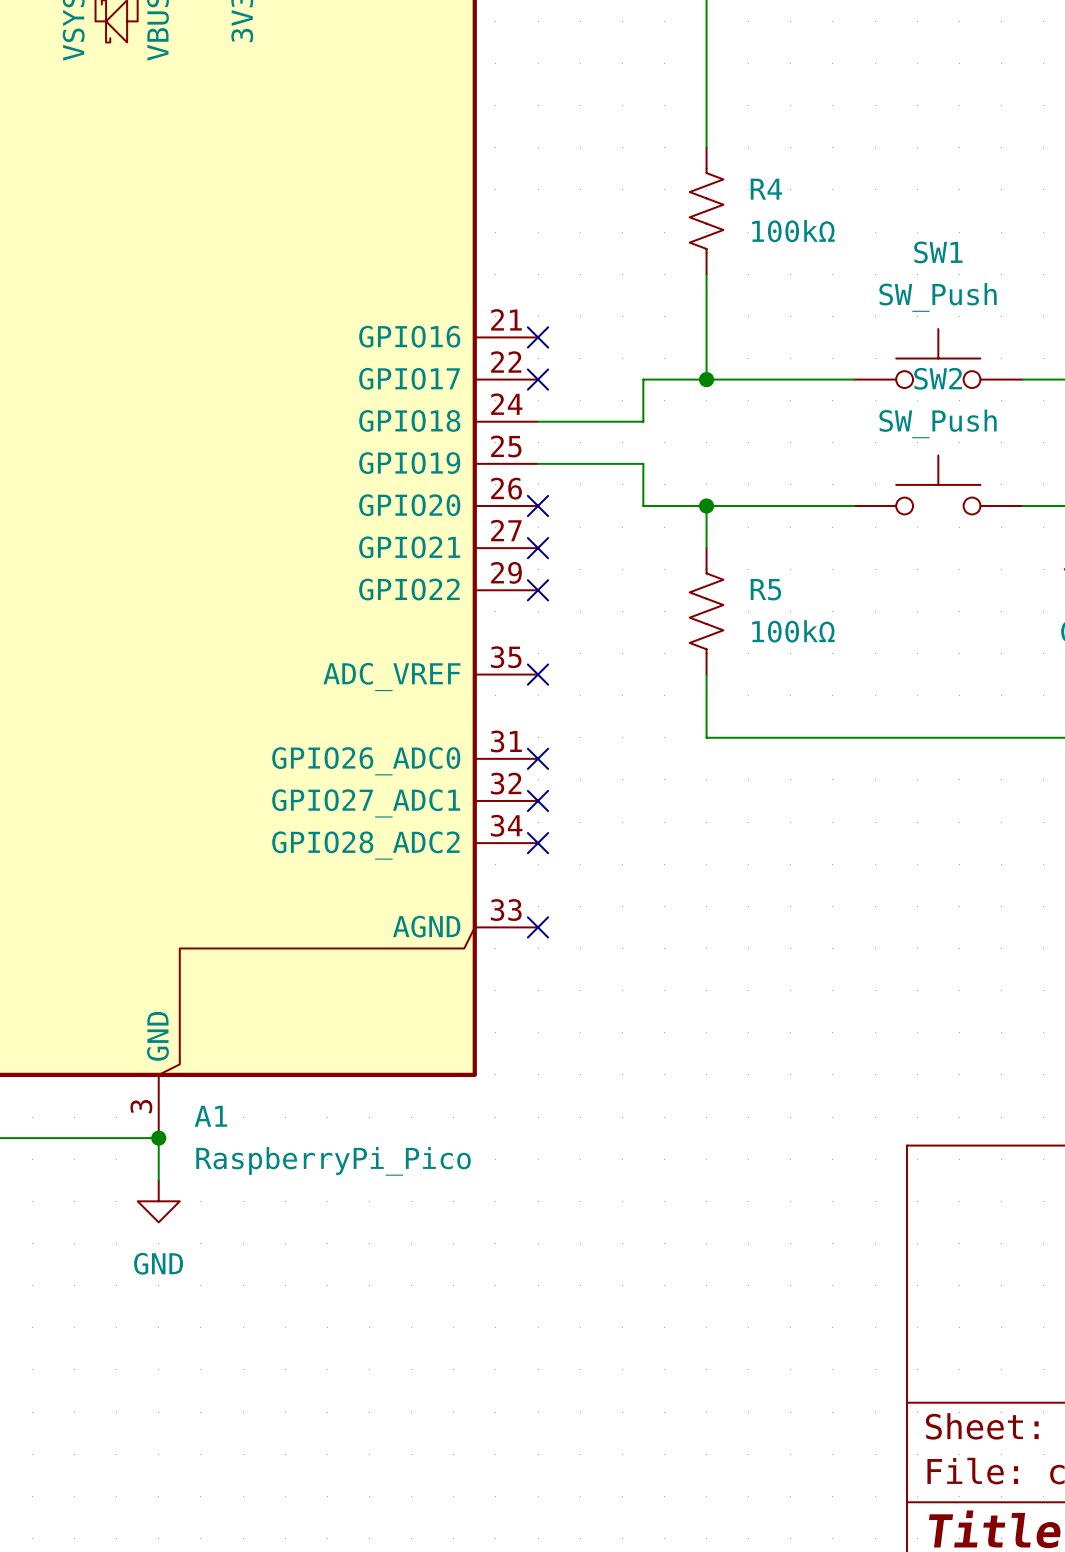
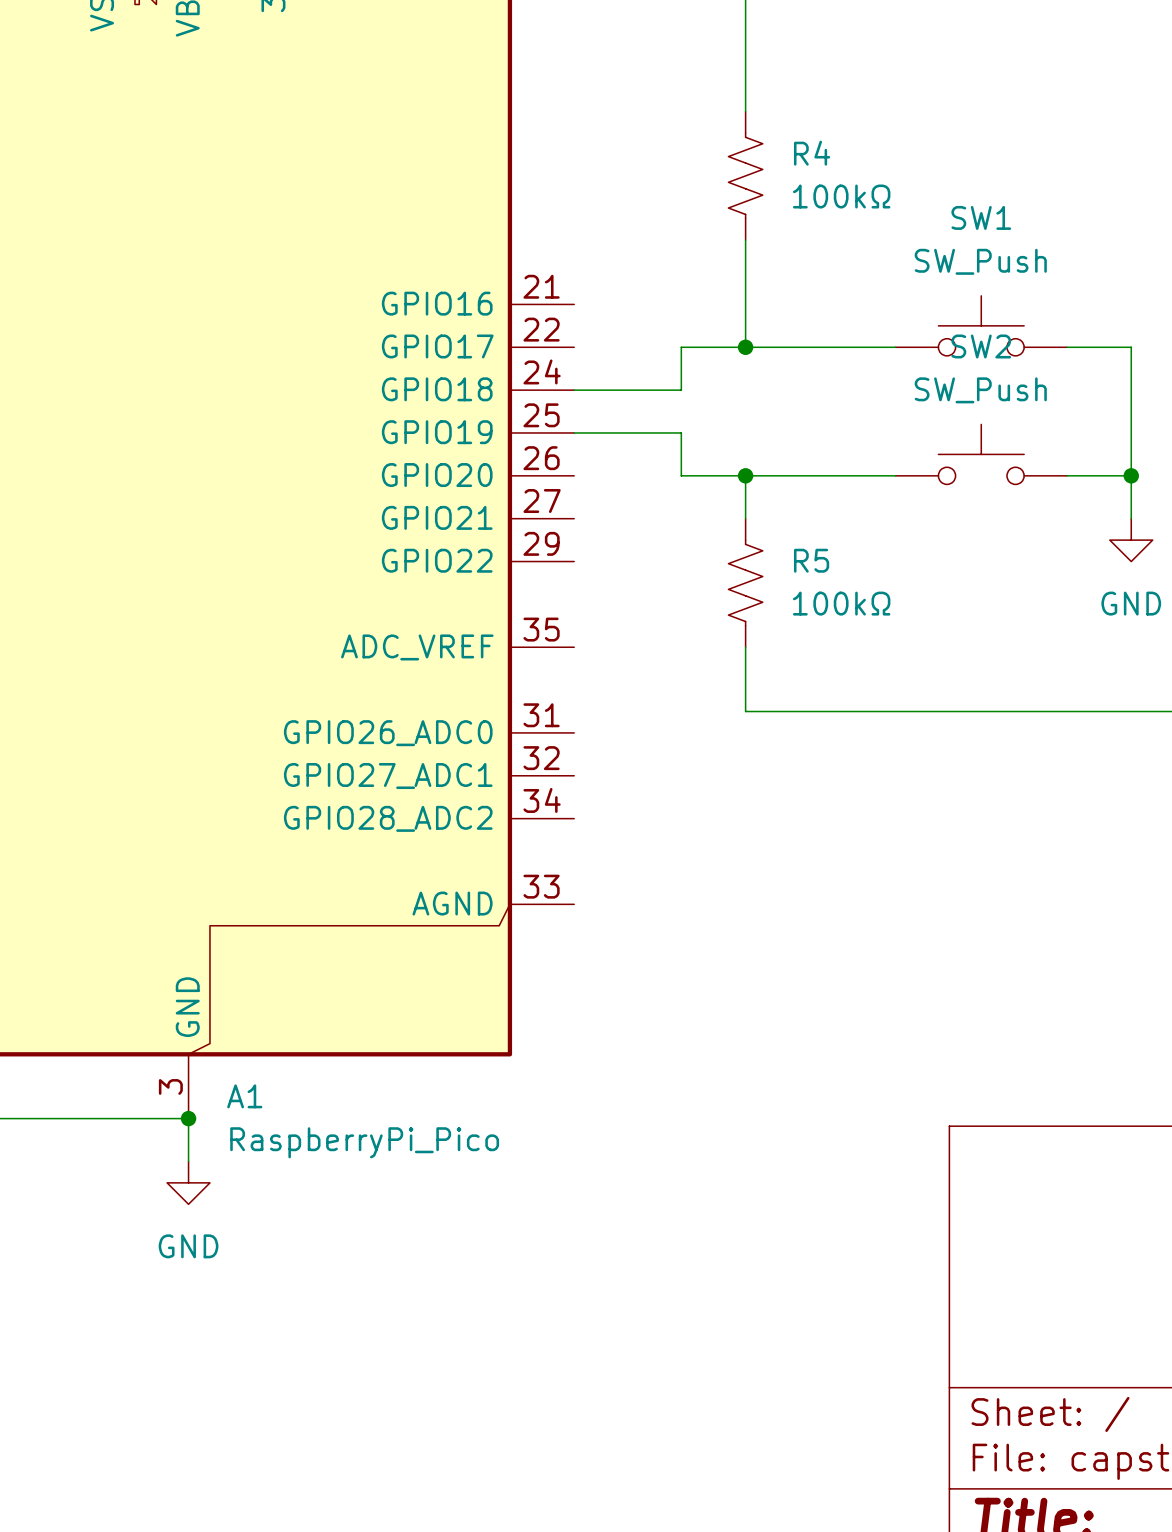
no-connect mark: (538, 337) -> none
no-connect mark: (538, 379) -> none
no-connect mark: (538, 506) -> none
no-connect mark: (538, 548) -> none
no-connect mark: (538, 590) -> none
no-connect mark: (538, 674) -> none
no-connect mark: (538, 758) -> none
no-connect mark: (538, 800) -> none
no-connect mark: (538, 843) -> none
no-connect mark: (538, 927) -> none

